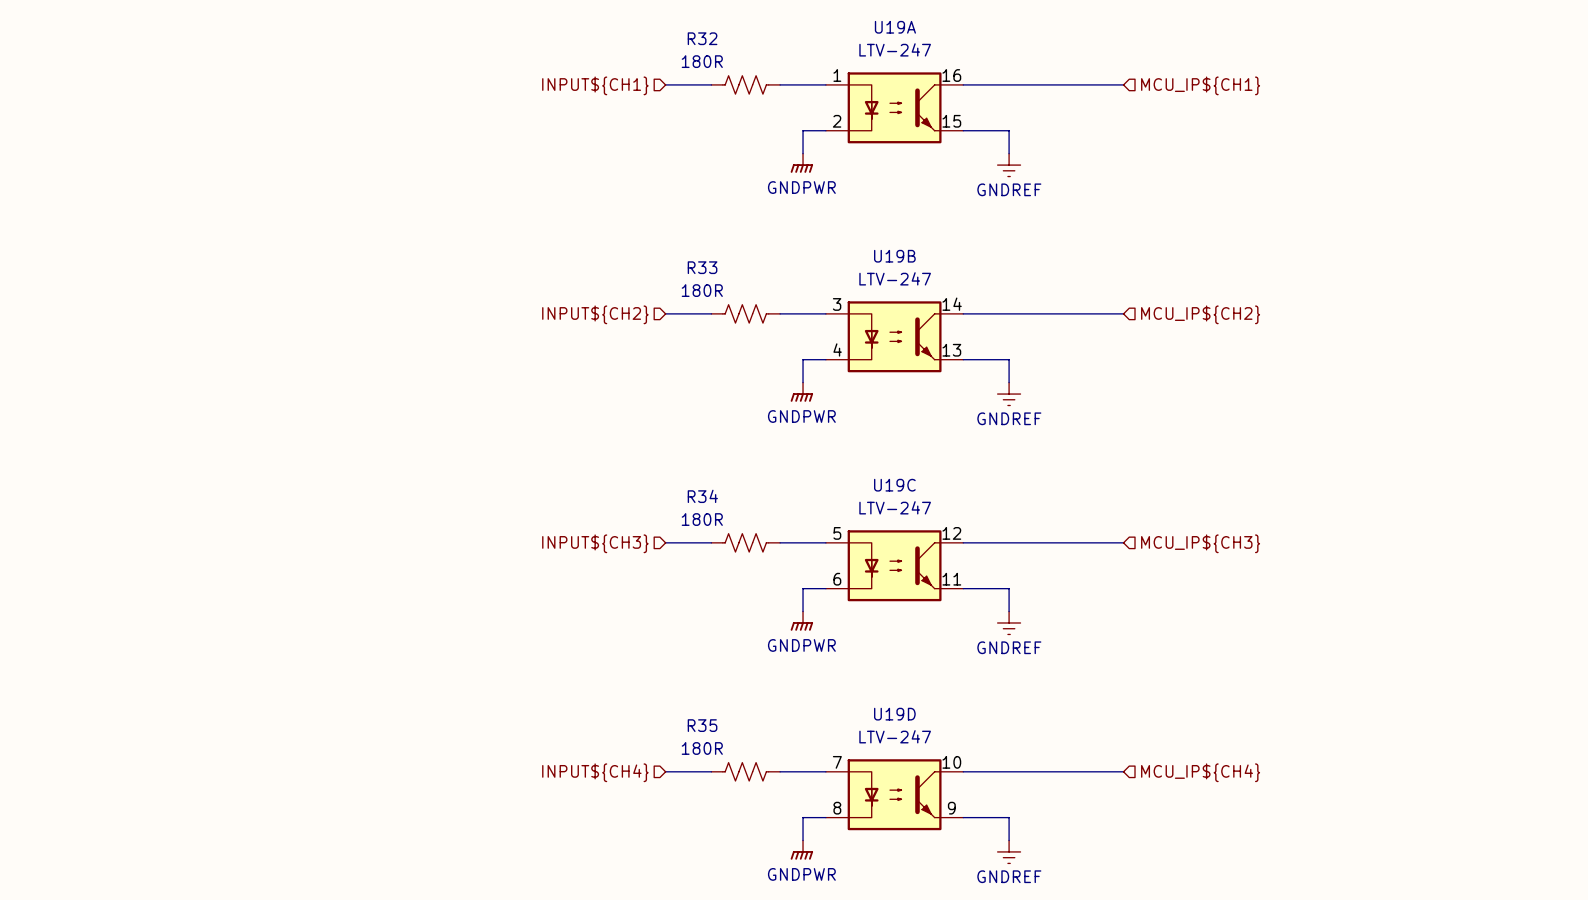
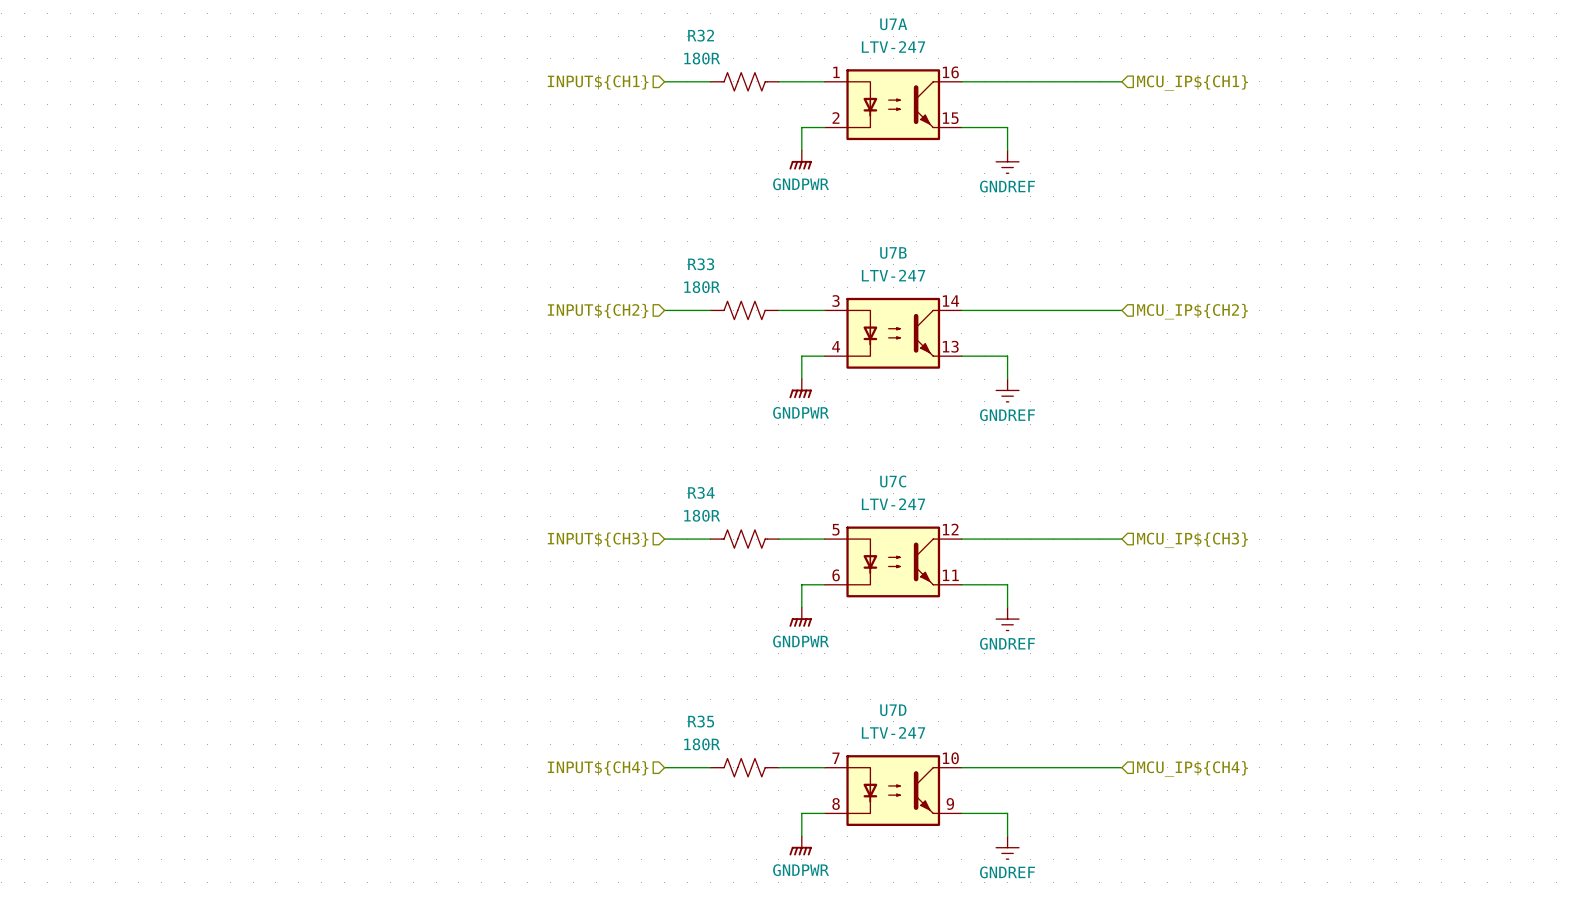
U19A name: U19A (895, 27) -> U7A (893, 24)
U19B name: U19B (894, 256) -> U7B (893, 252)
U19C name: U19C (894, 485) -> U7C (893, 481)
U19D name: U19D (894, 714) -> U7D (893, 710)

